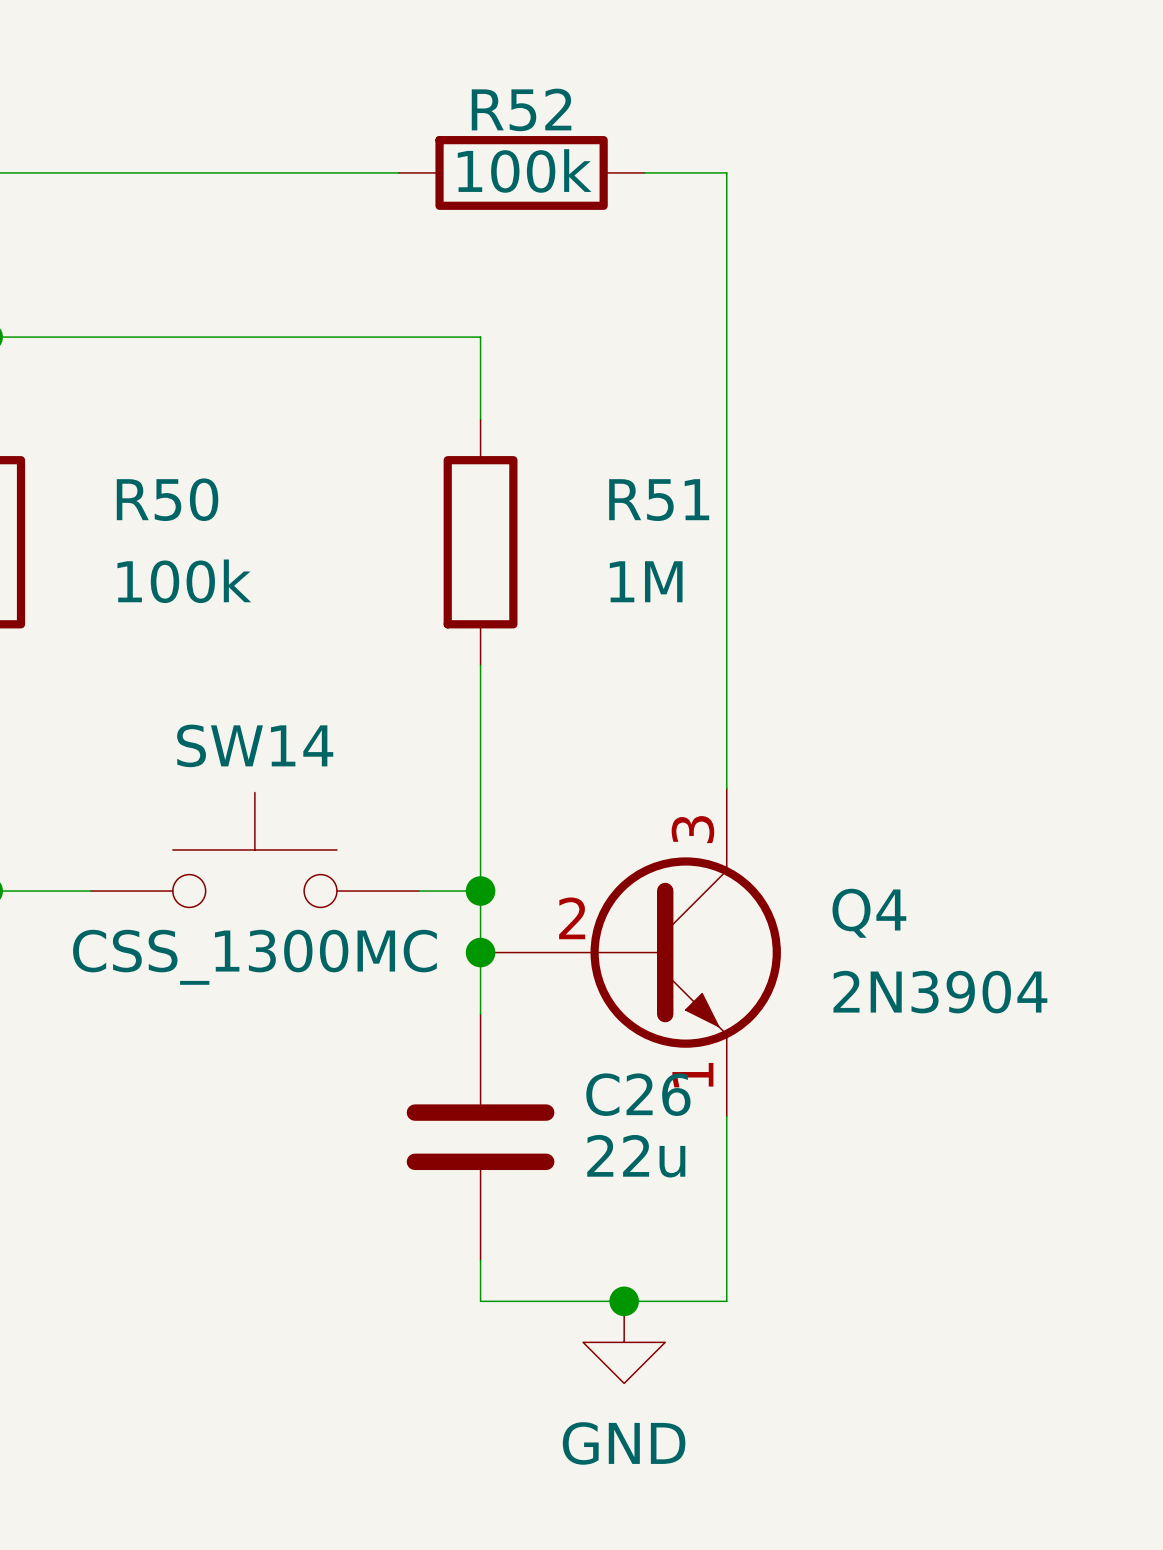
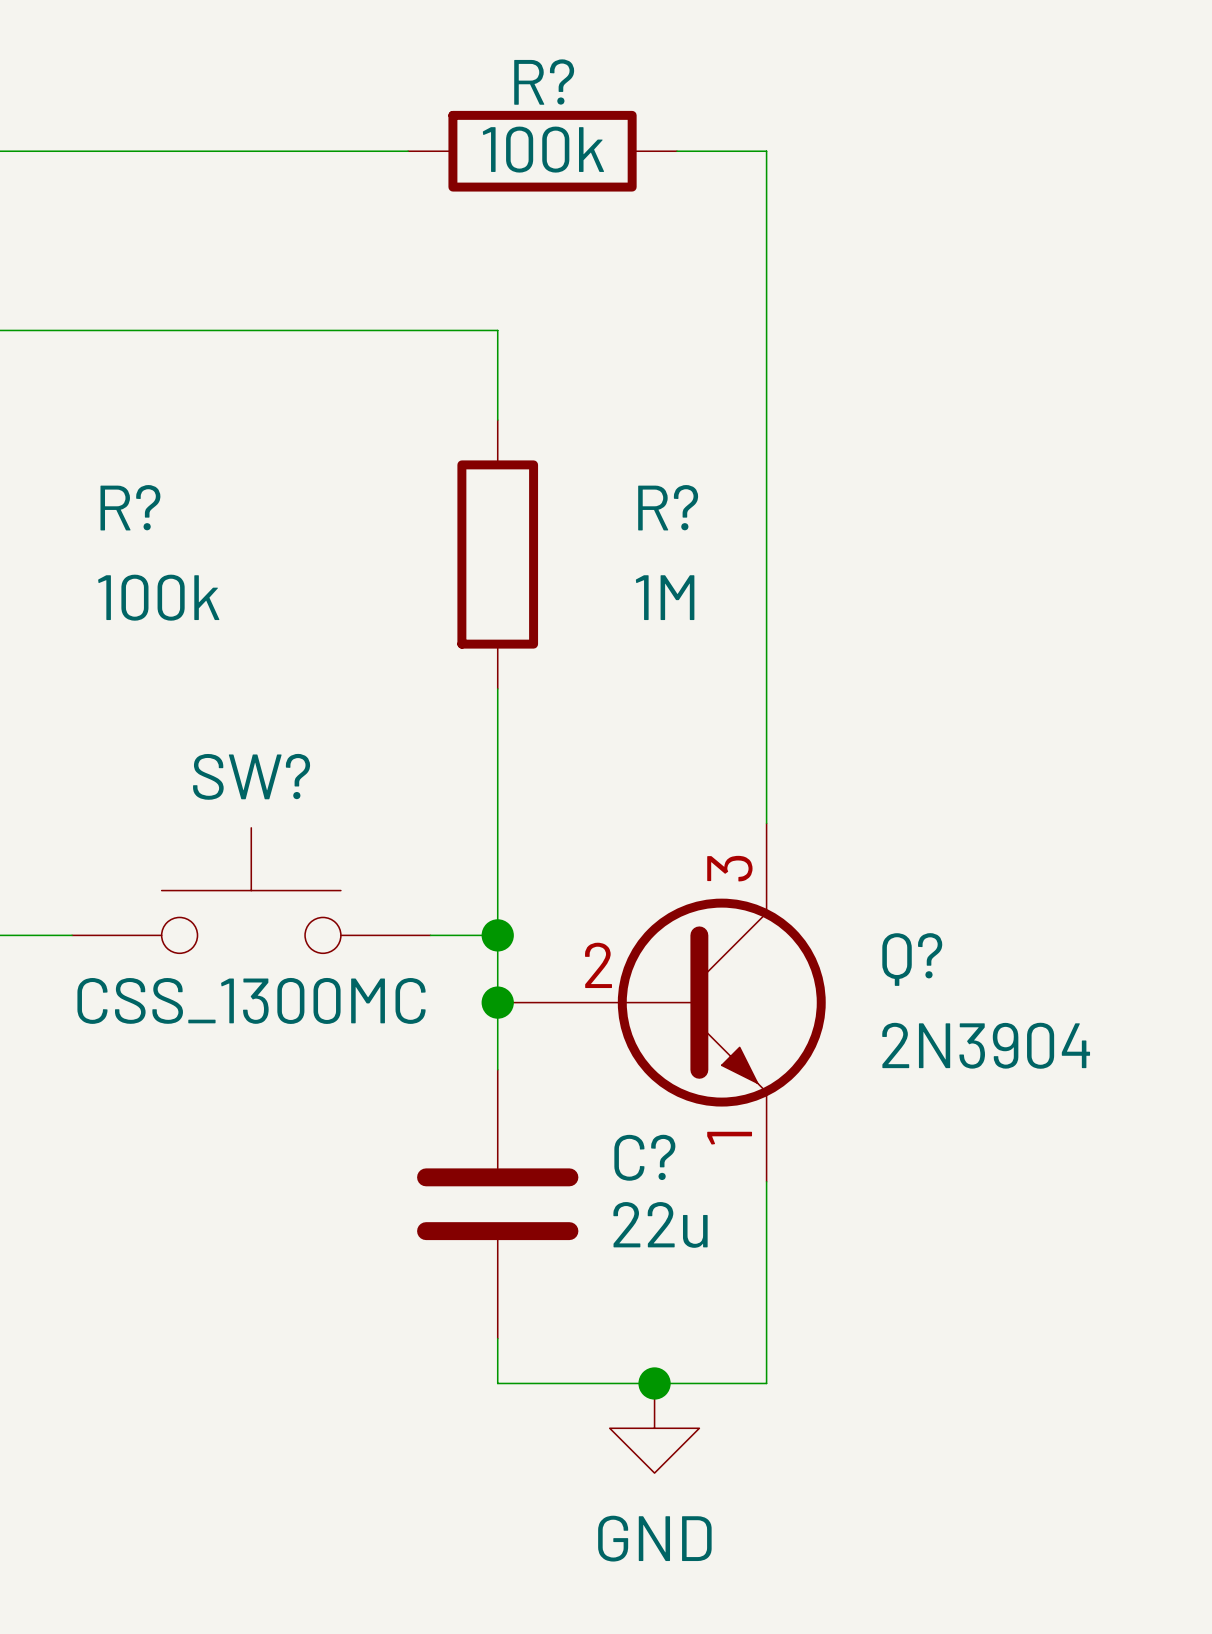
R52 name: R52 (521, 109) -> R? (544, 82)
R50 name: R50 (167, 499) -> R? (130, 507)
R51 name: R51 (659, 500) -> R? (668, 507)
SW14 name: SW14 (255, 745) -> SW? (251, 776)
Q4 name: Q4 (869, 913) -> Q? (912, 959)
C26 name: C26 (638, 1094) -> C? (644, 1157)

